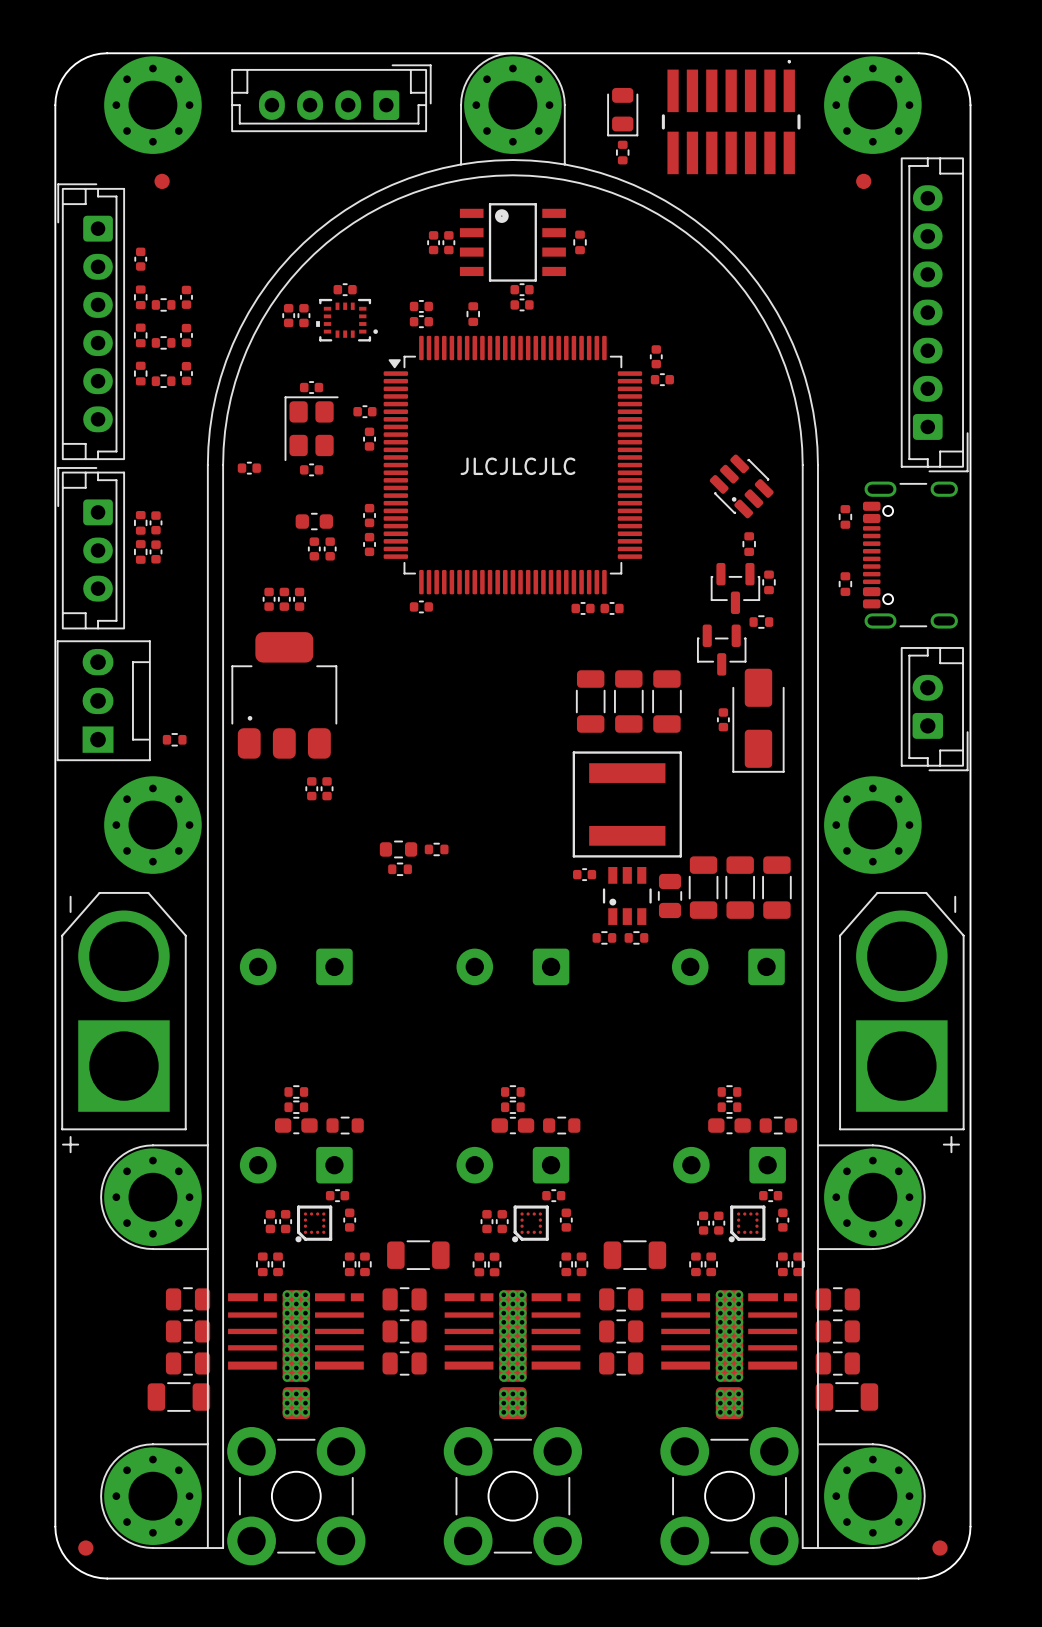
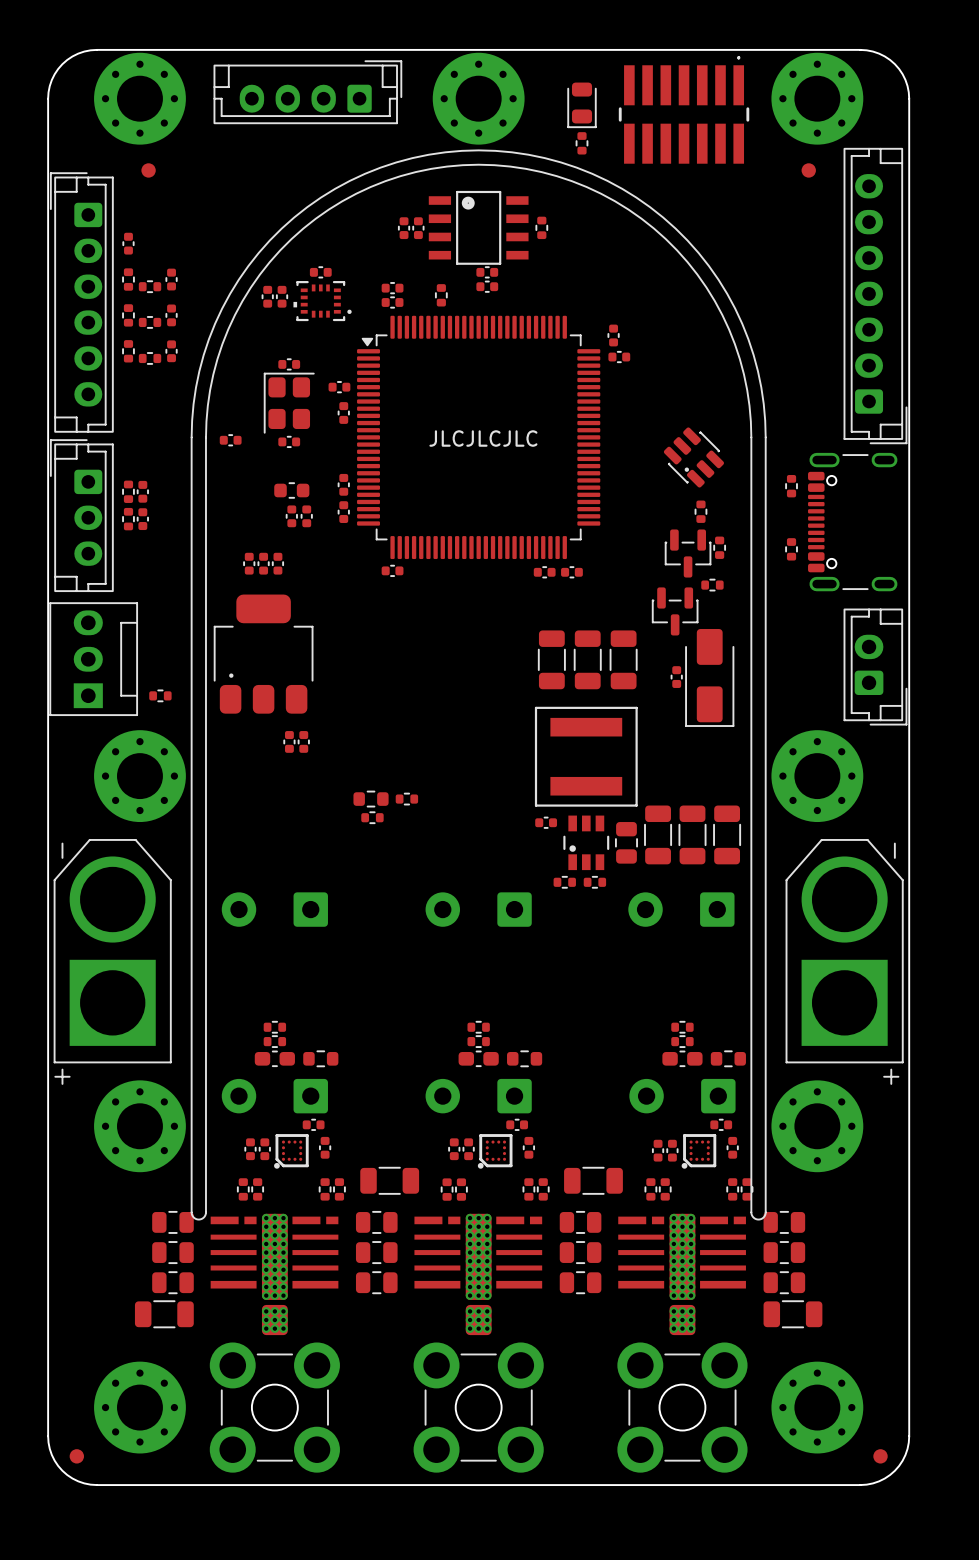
drawing: [100, 52, 926, 1549] -> none
drawing: none -> [190, 149, 767, 1221]

